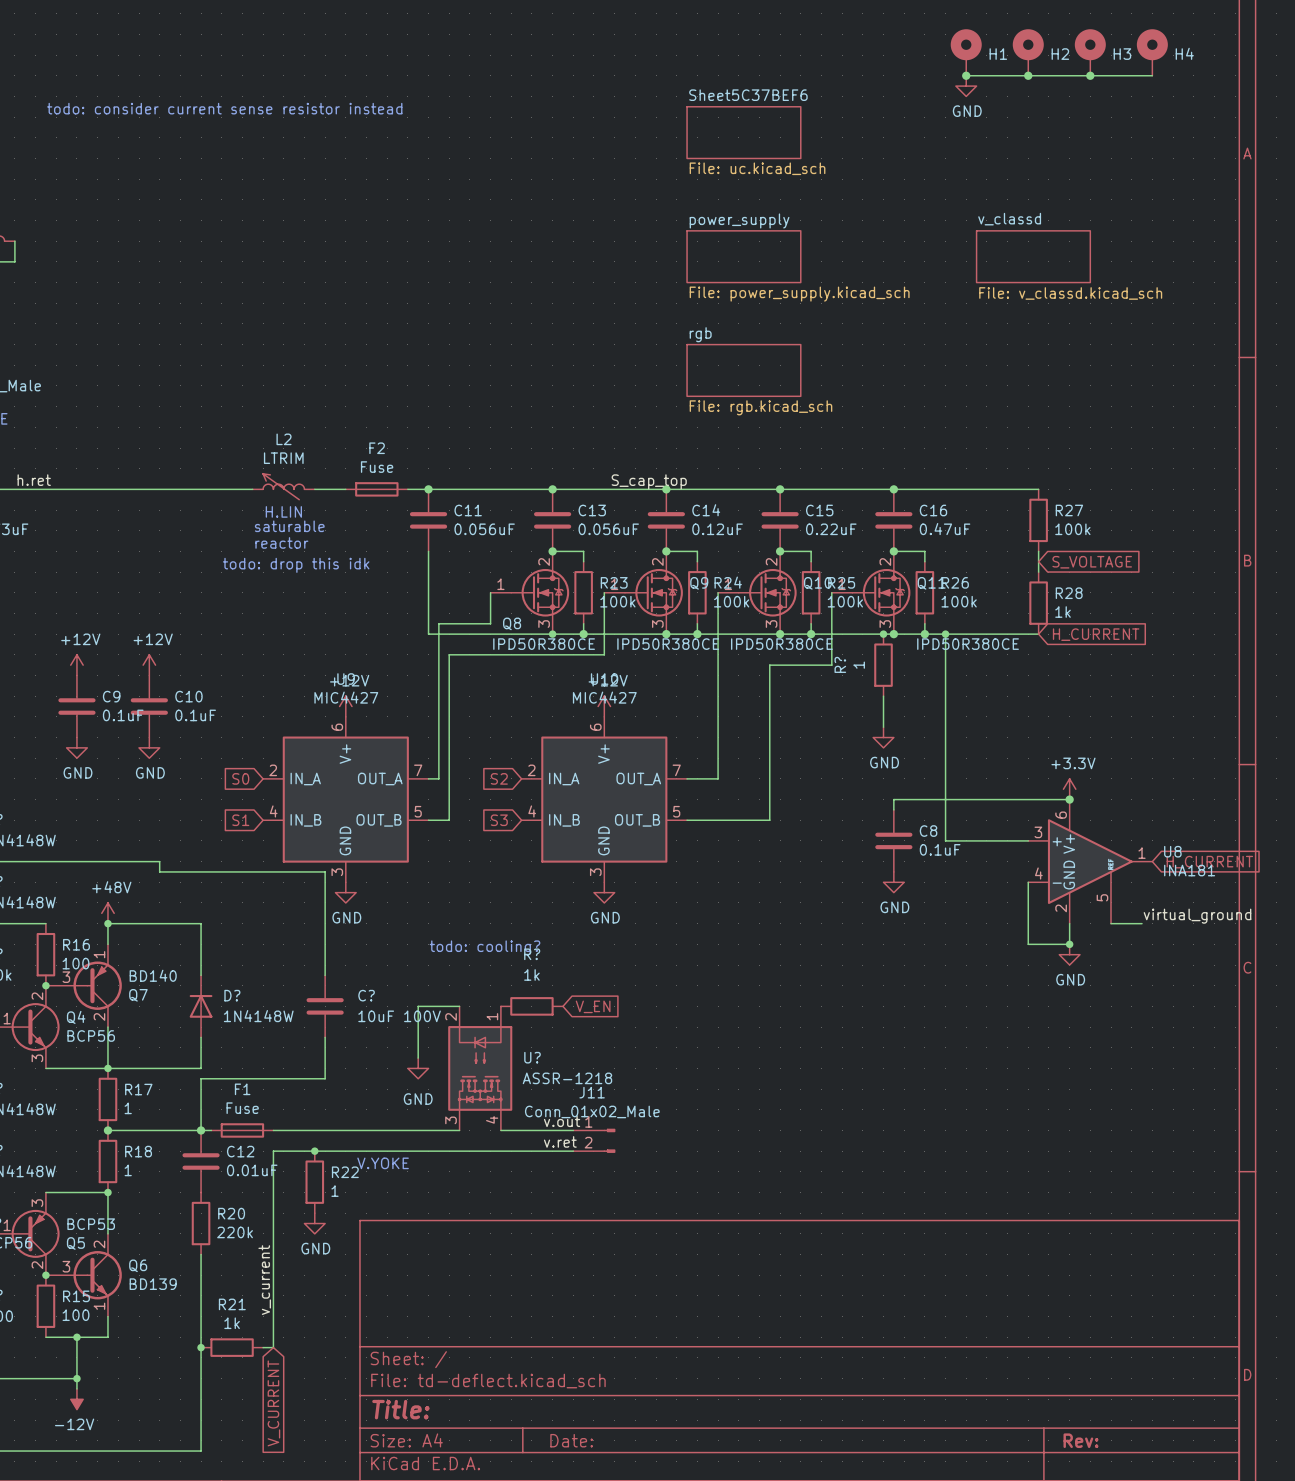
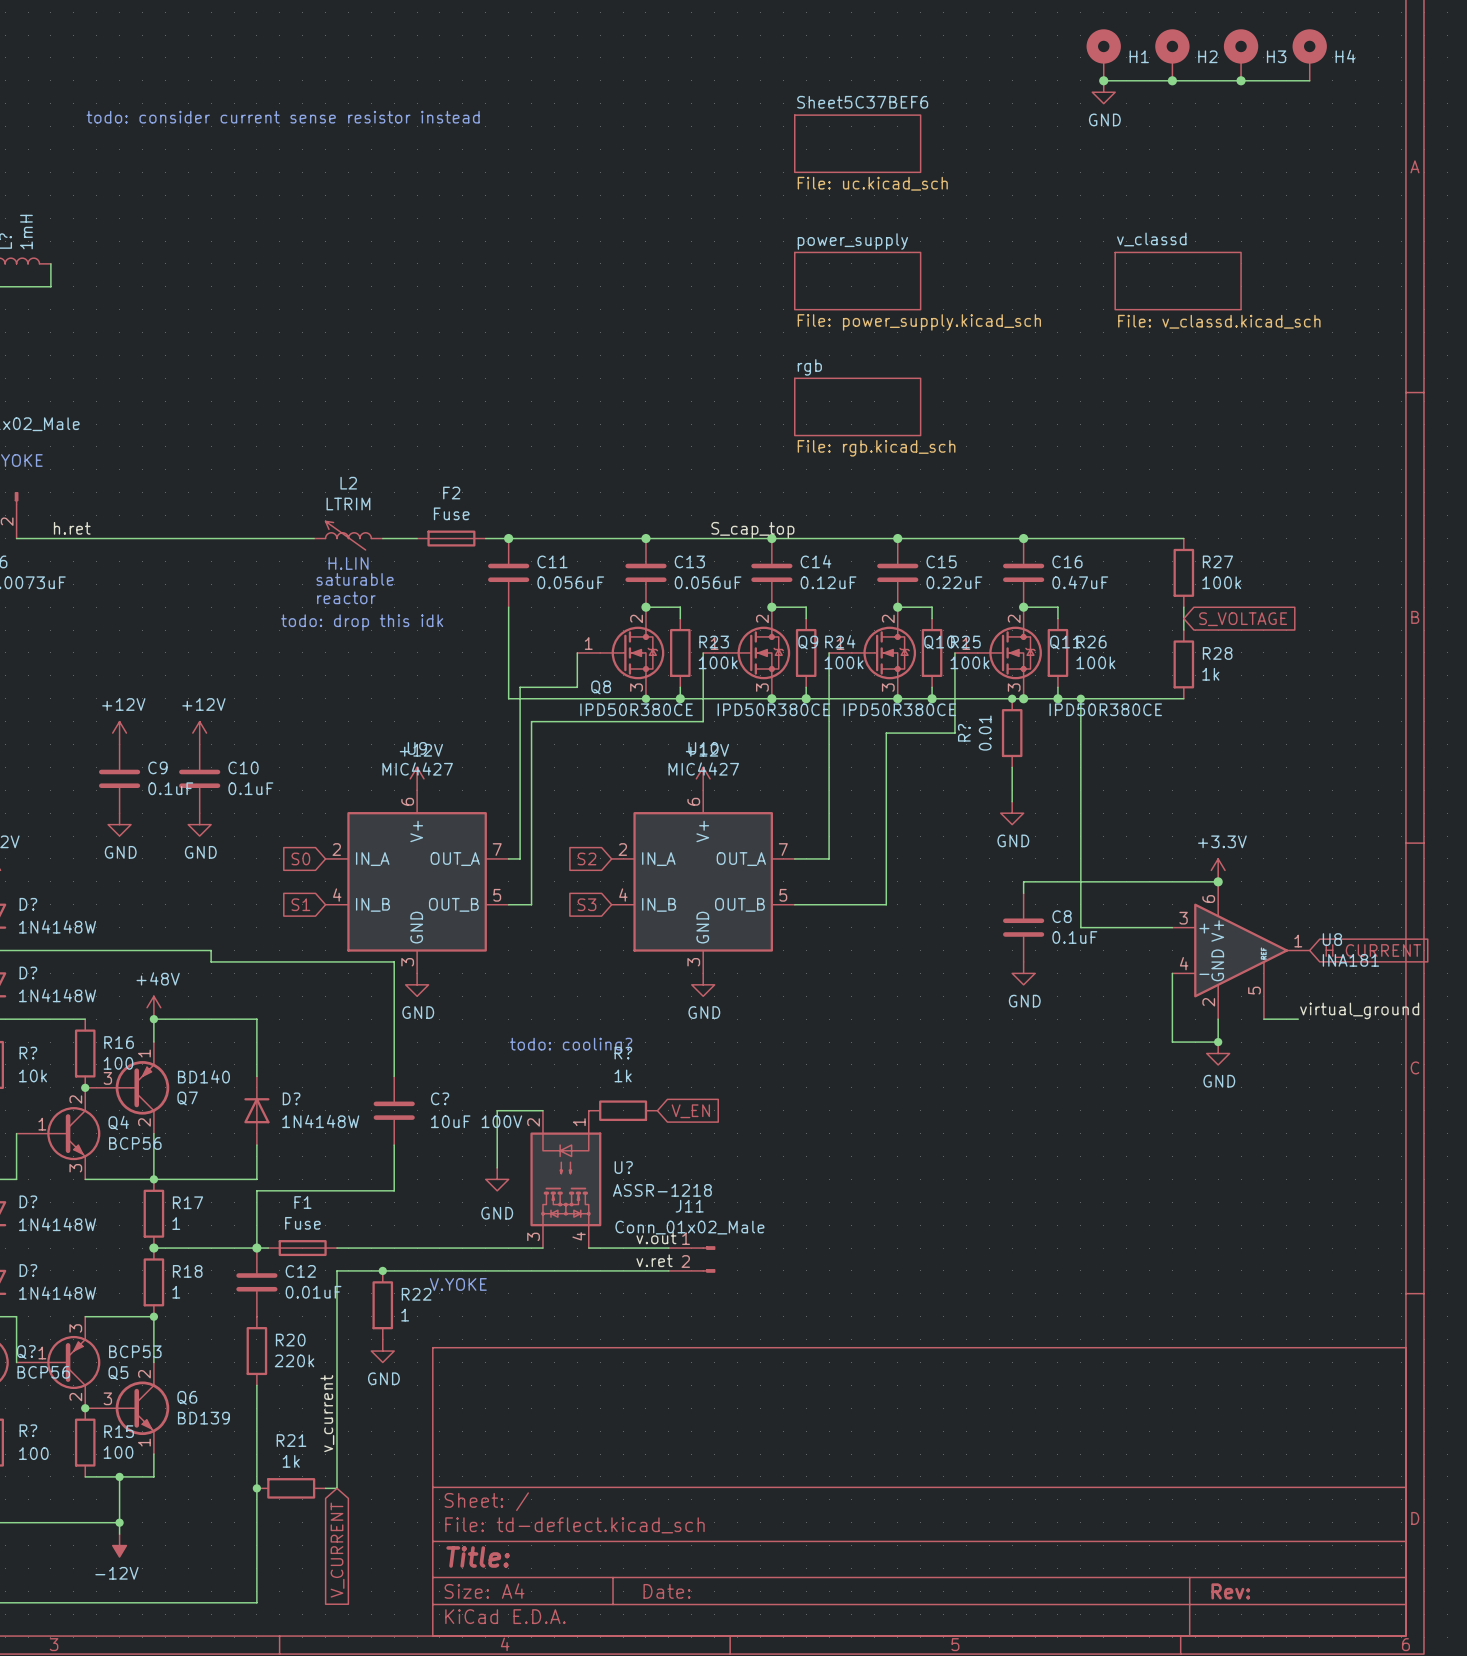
global label: H_CURRENT (1096, 634) -> none
R? value: 1 (859, 665) -> 0.01 (985, 733)

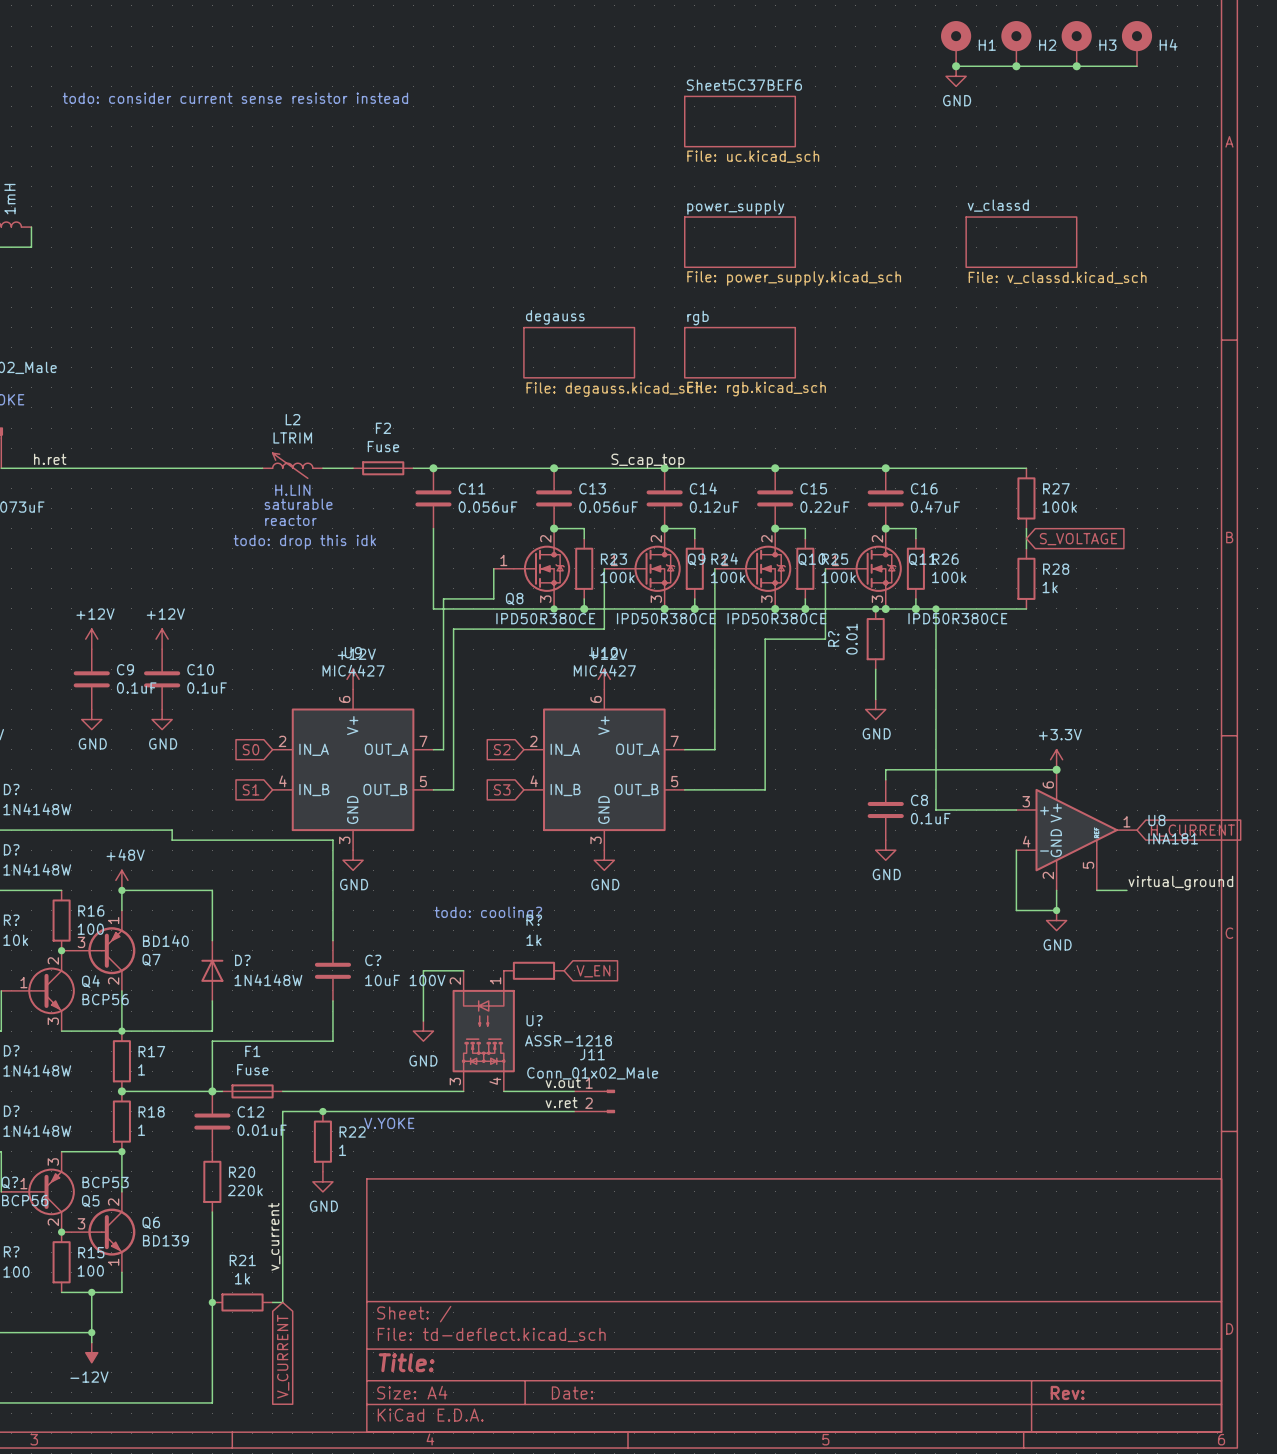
sheet degauss: none -> File: degauss.kicad_sch (579, 352)

